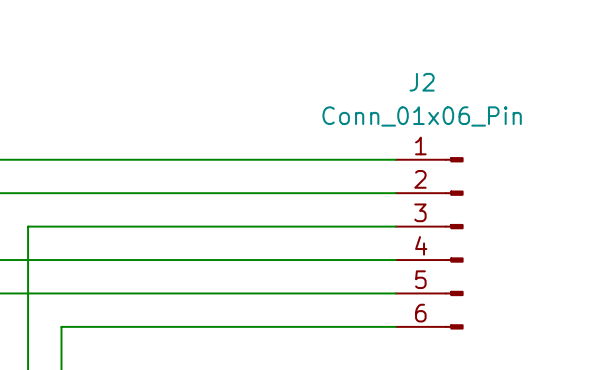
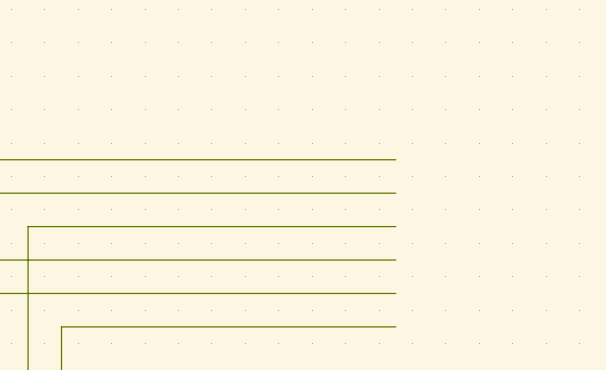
J2: Conn_01x06_Pin (429, 243) -> none

